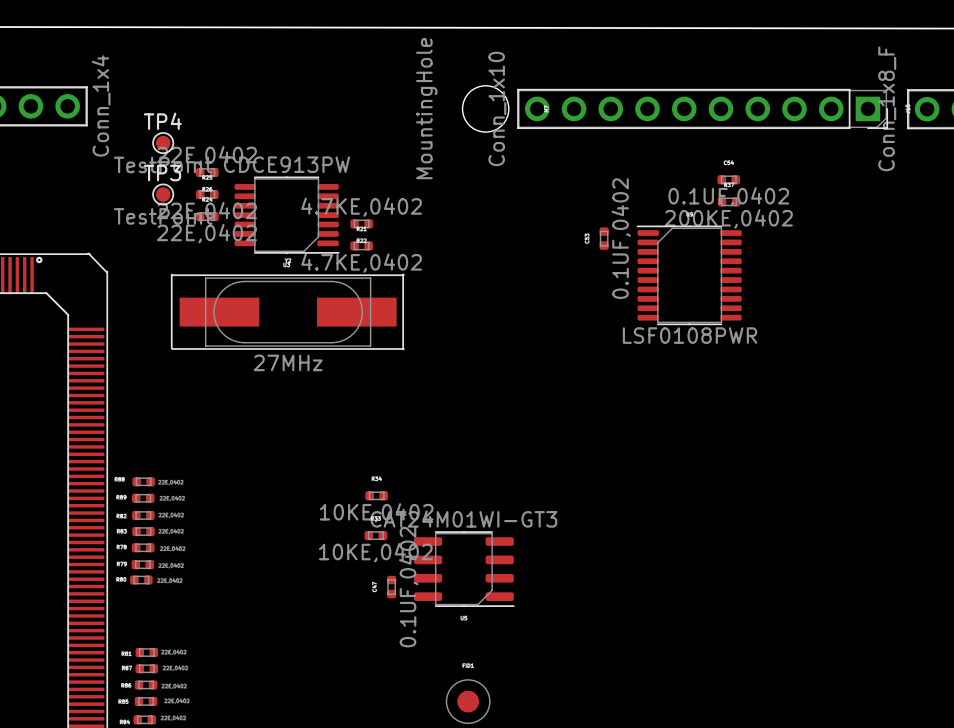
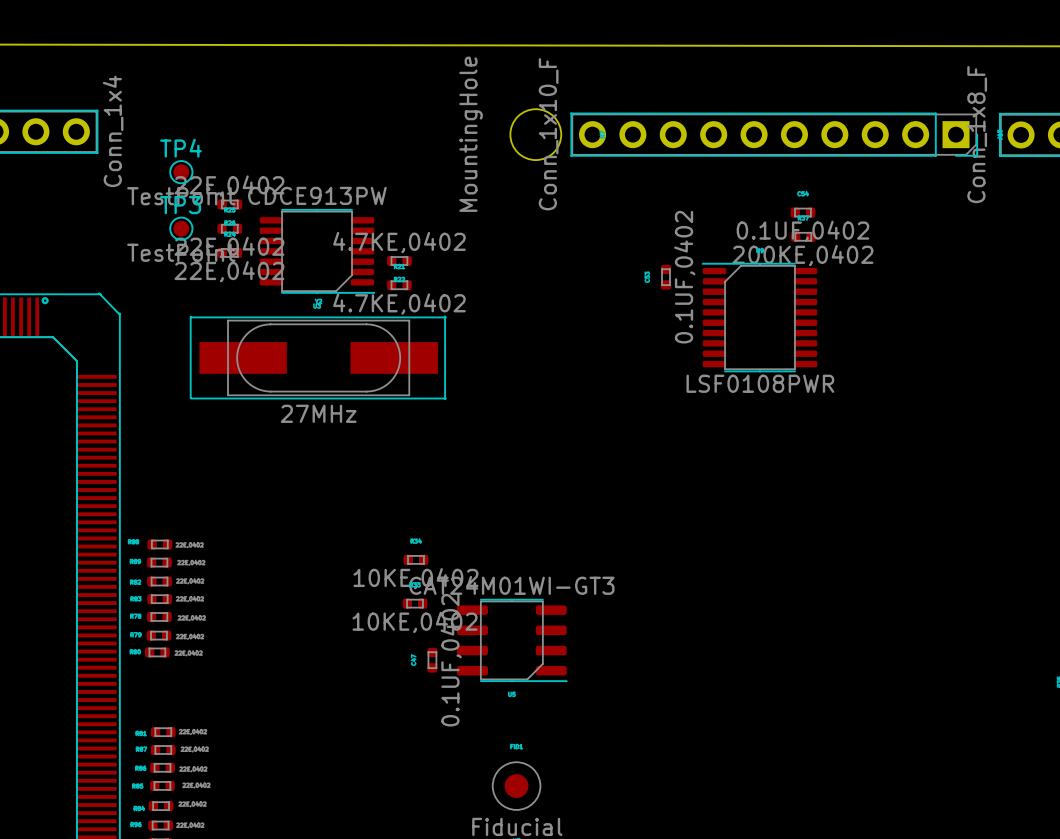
part value: Conn_1x10 (497, 108) -> Conn_1x10_F (548, 134)

